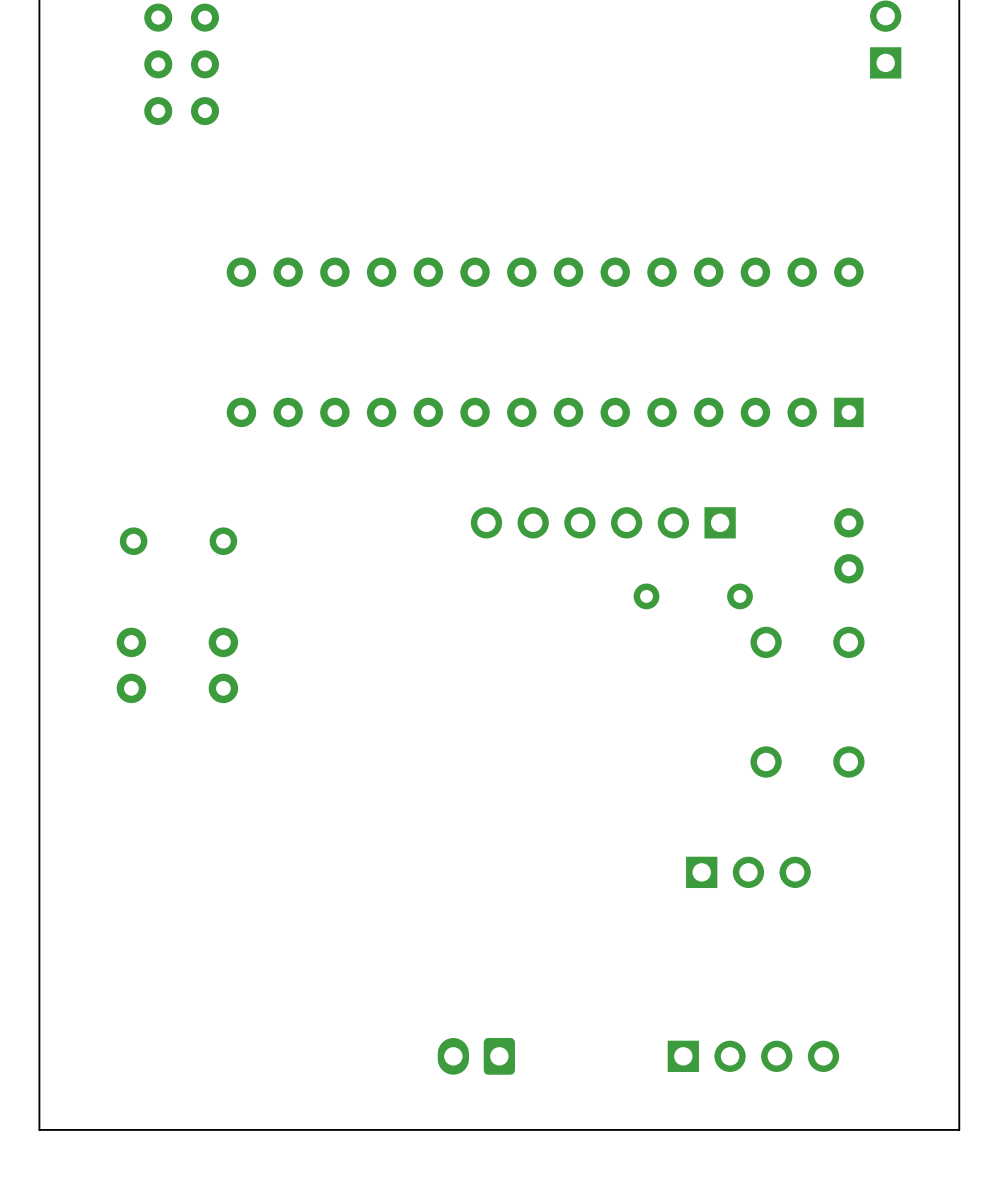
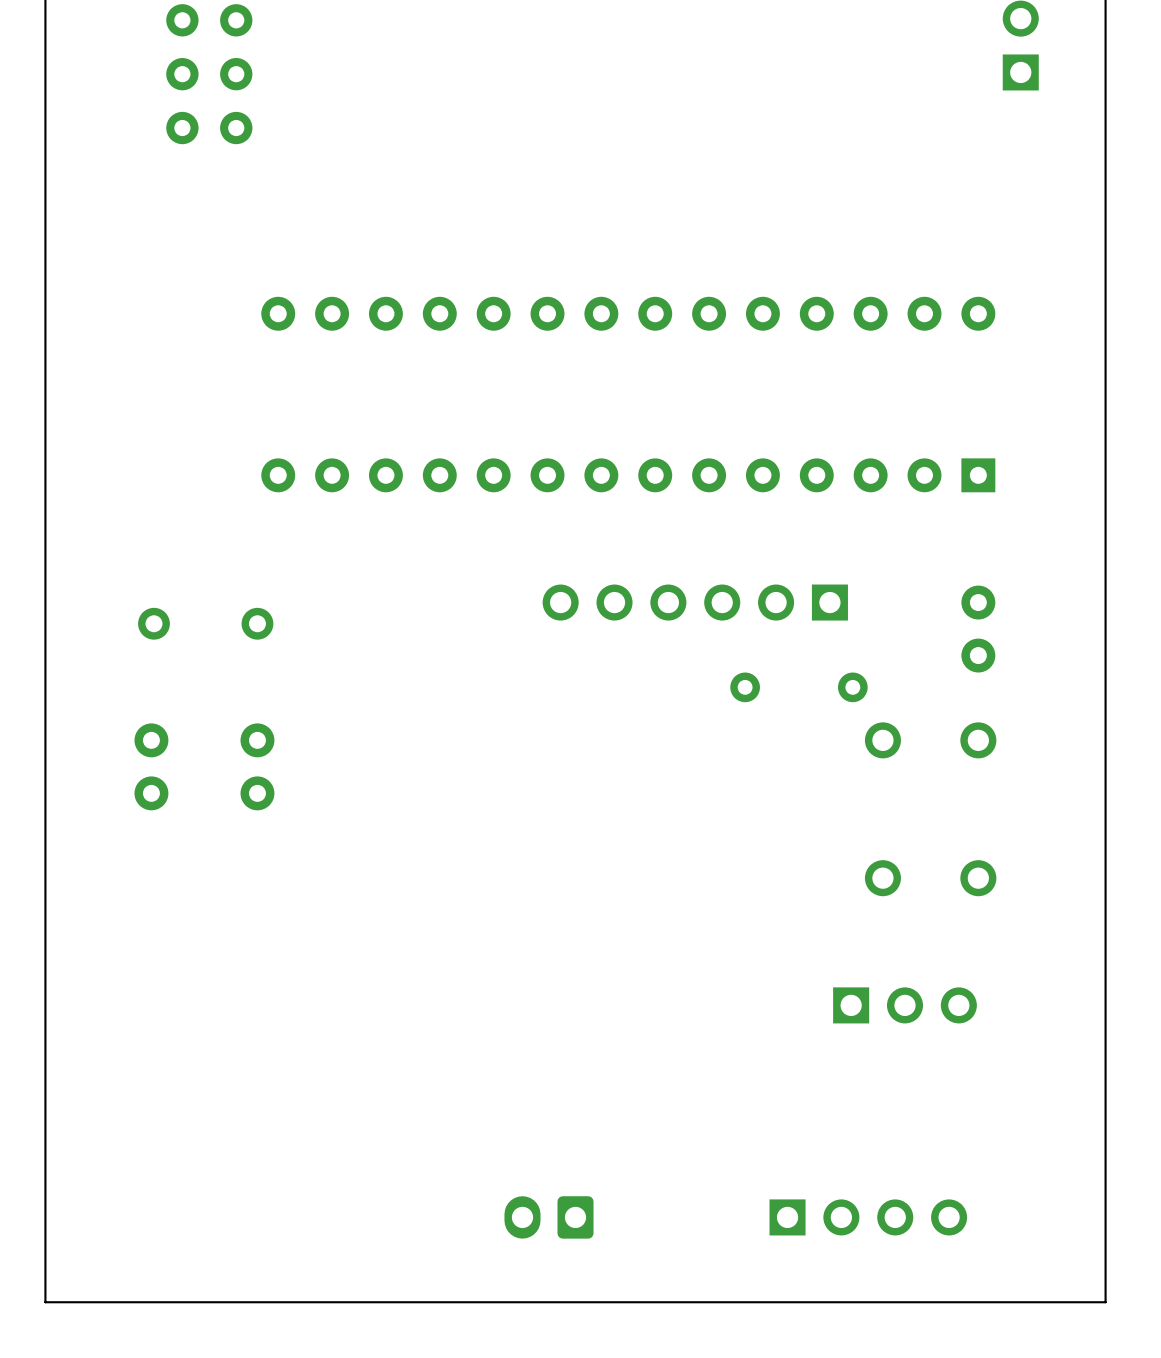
part position: (748, 872) -> (904, 1005)

